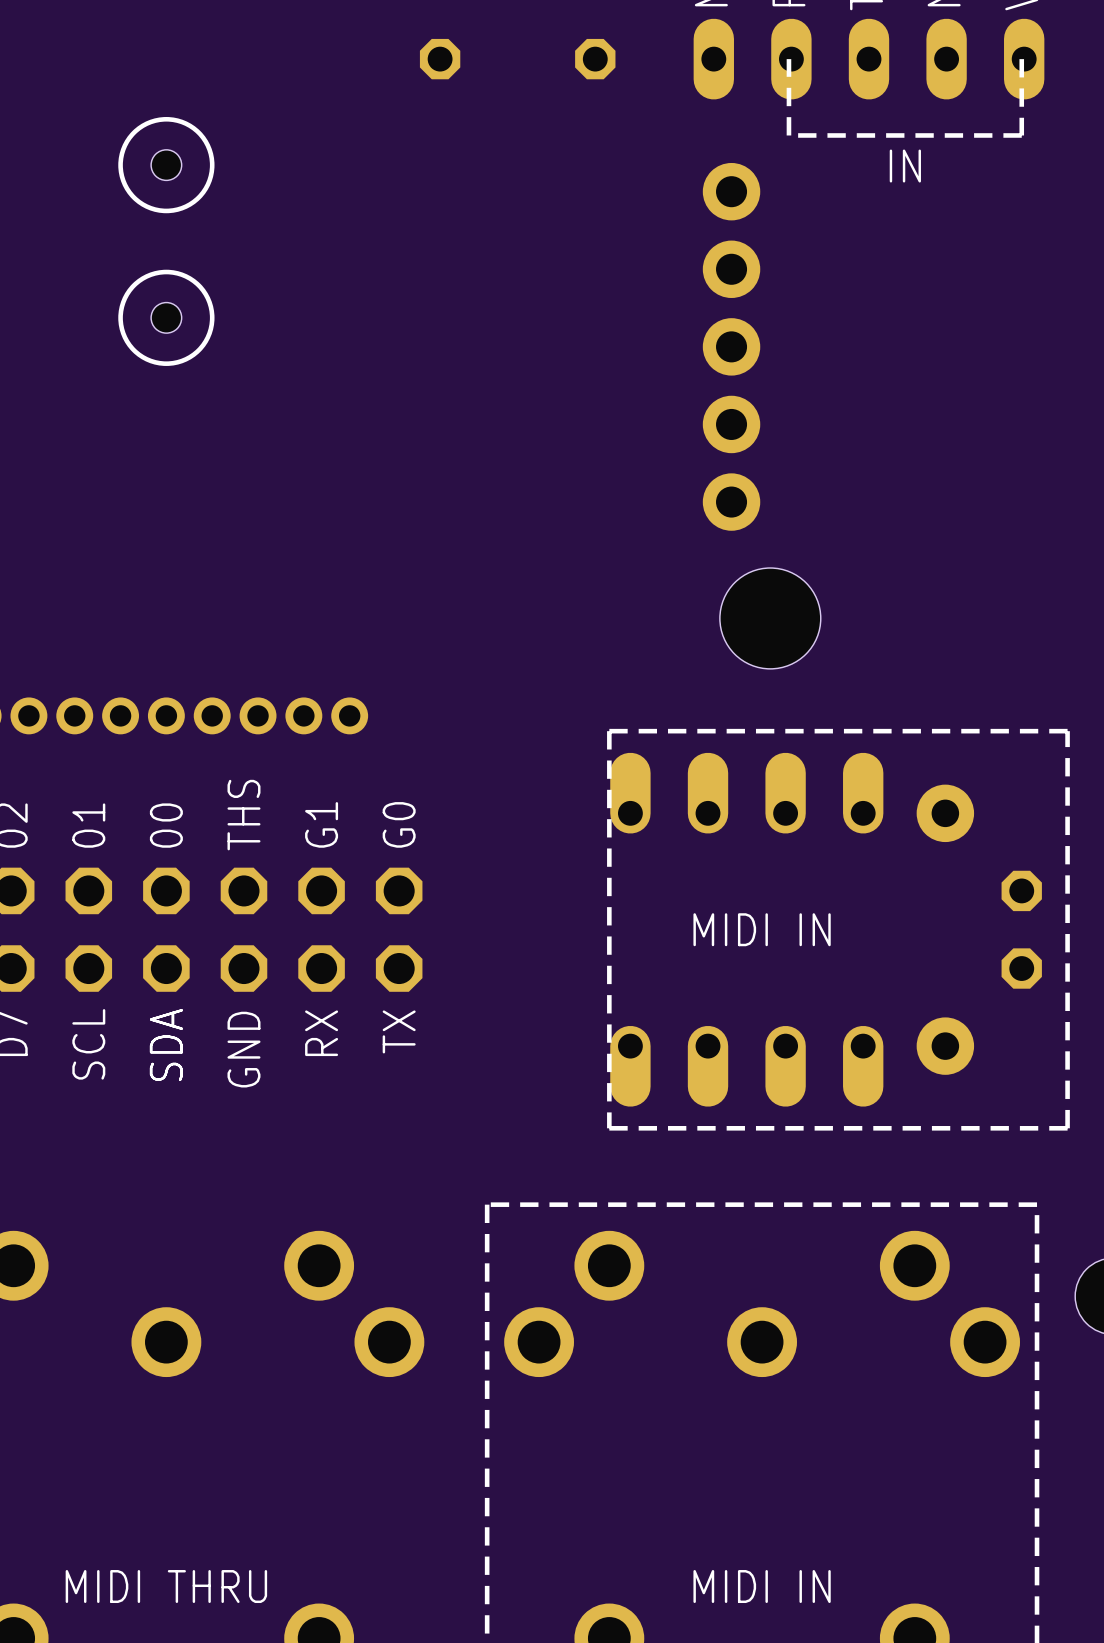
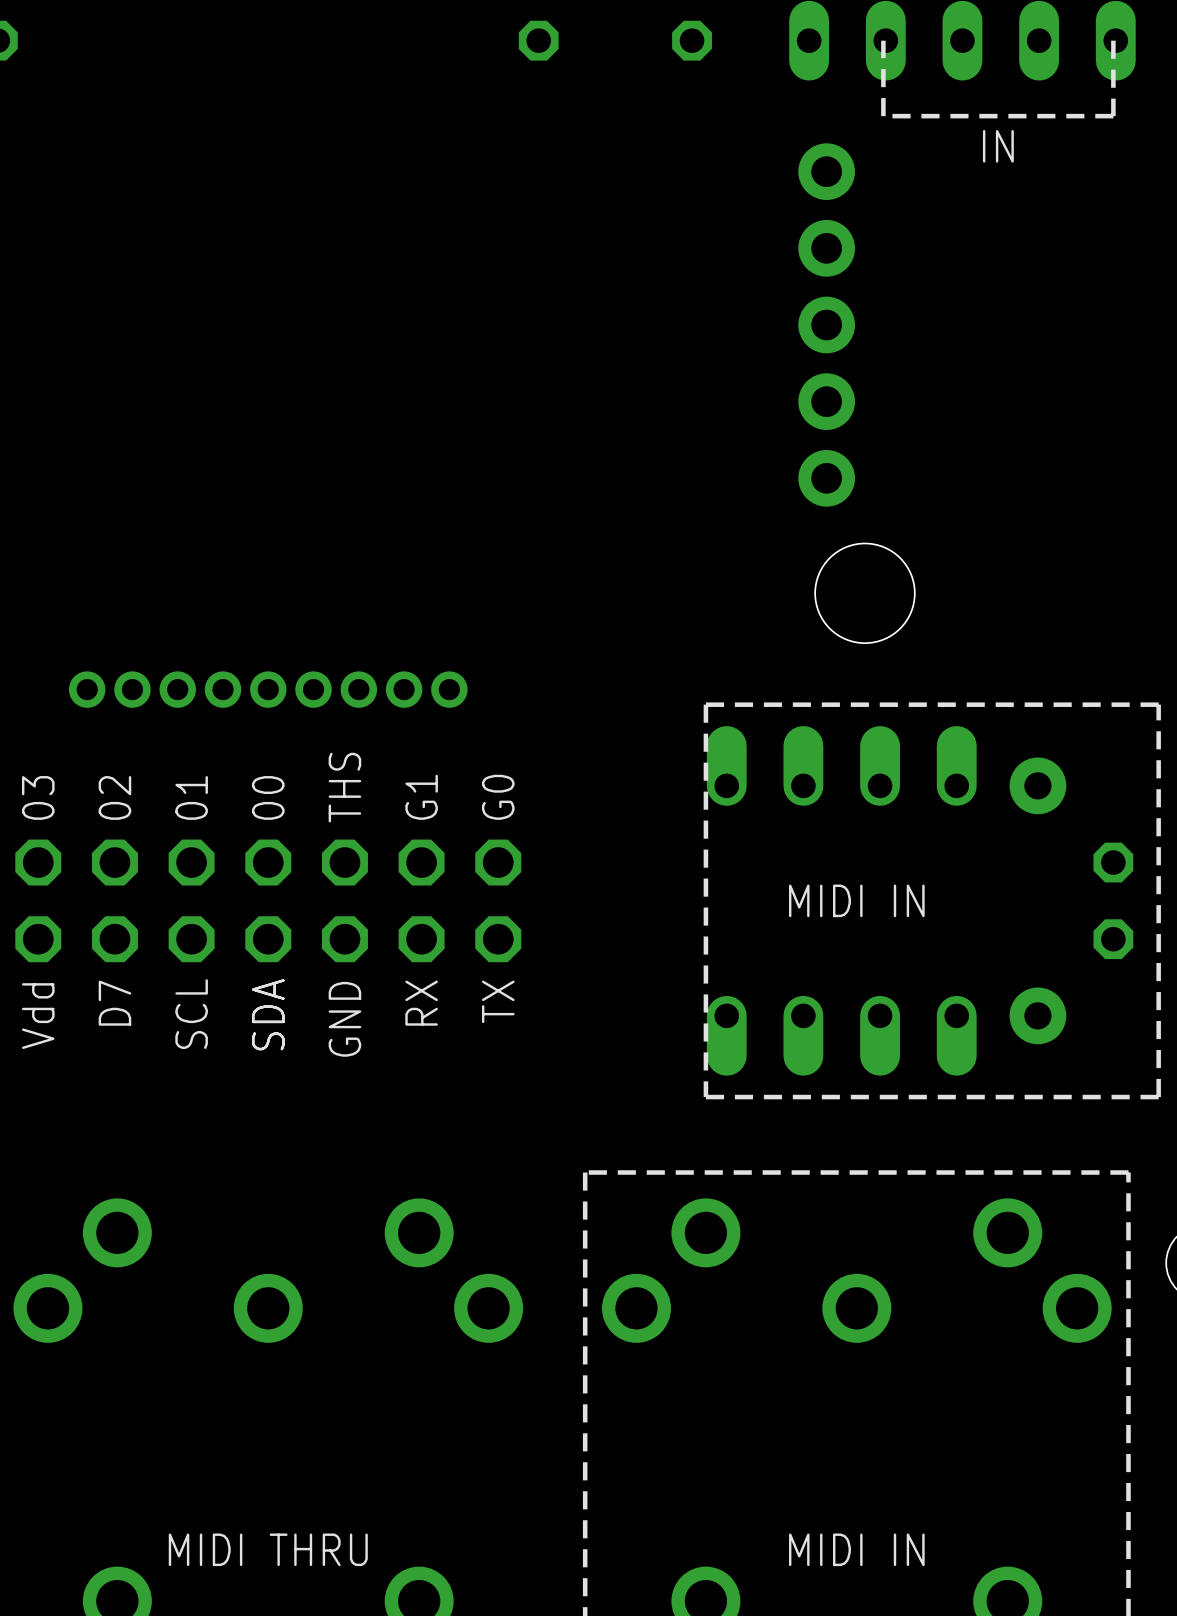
drawing: [118, 117, 215, 214] -> none
hole: (166, 165) -> none
drawing: [118, 269, 215, 366] -> none
hole: (166, 317) -> none

